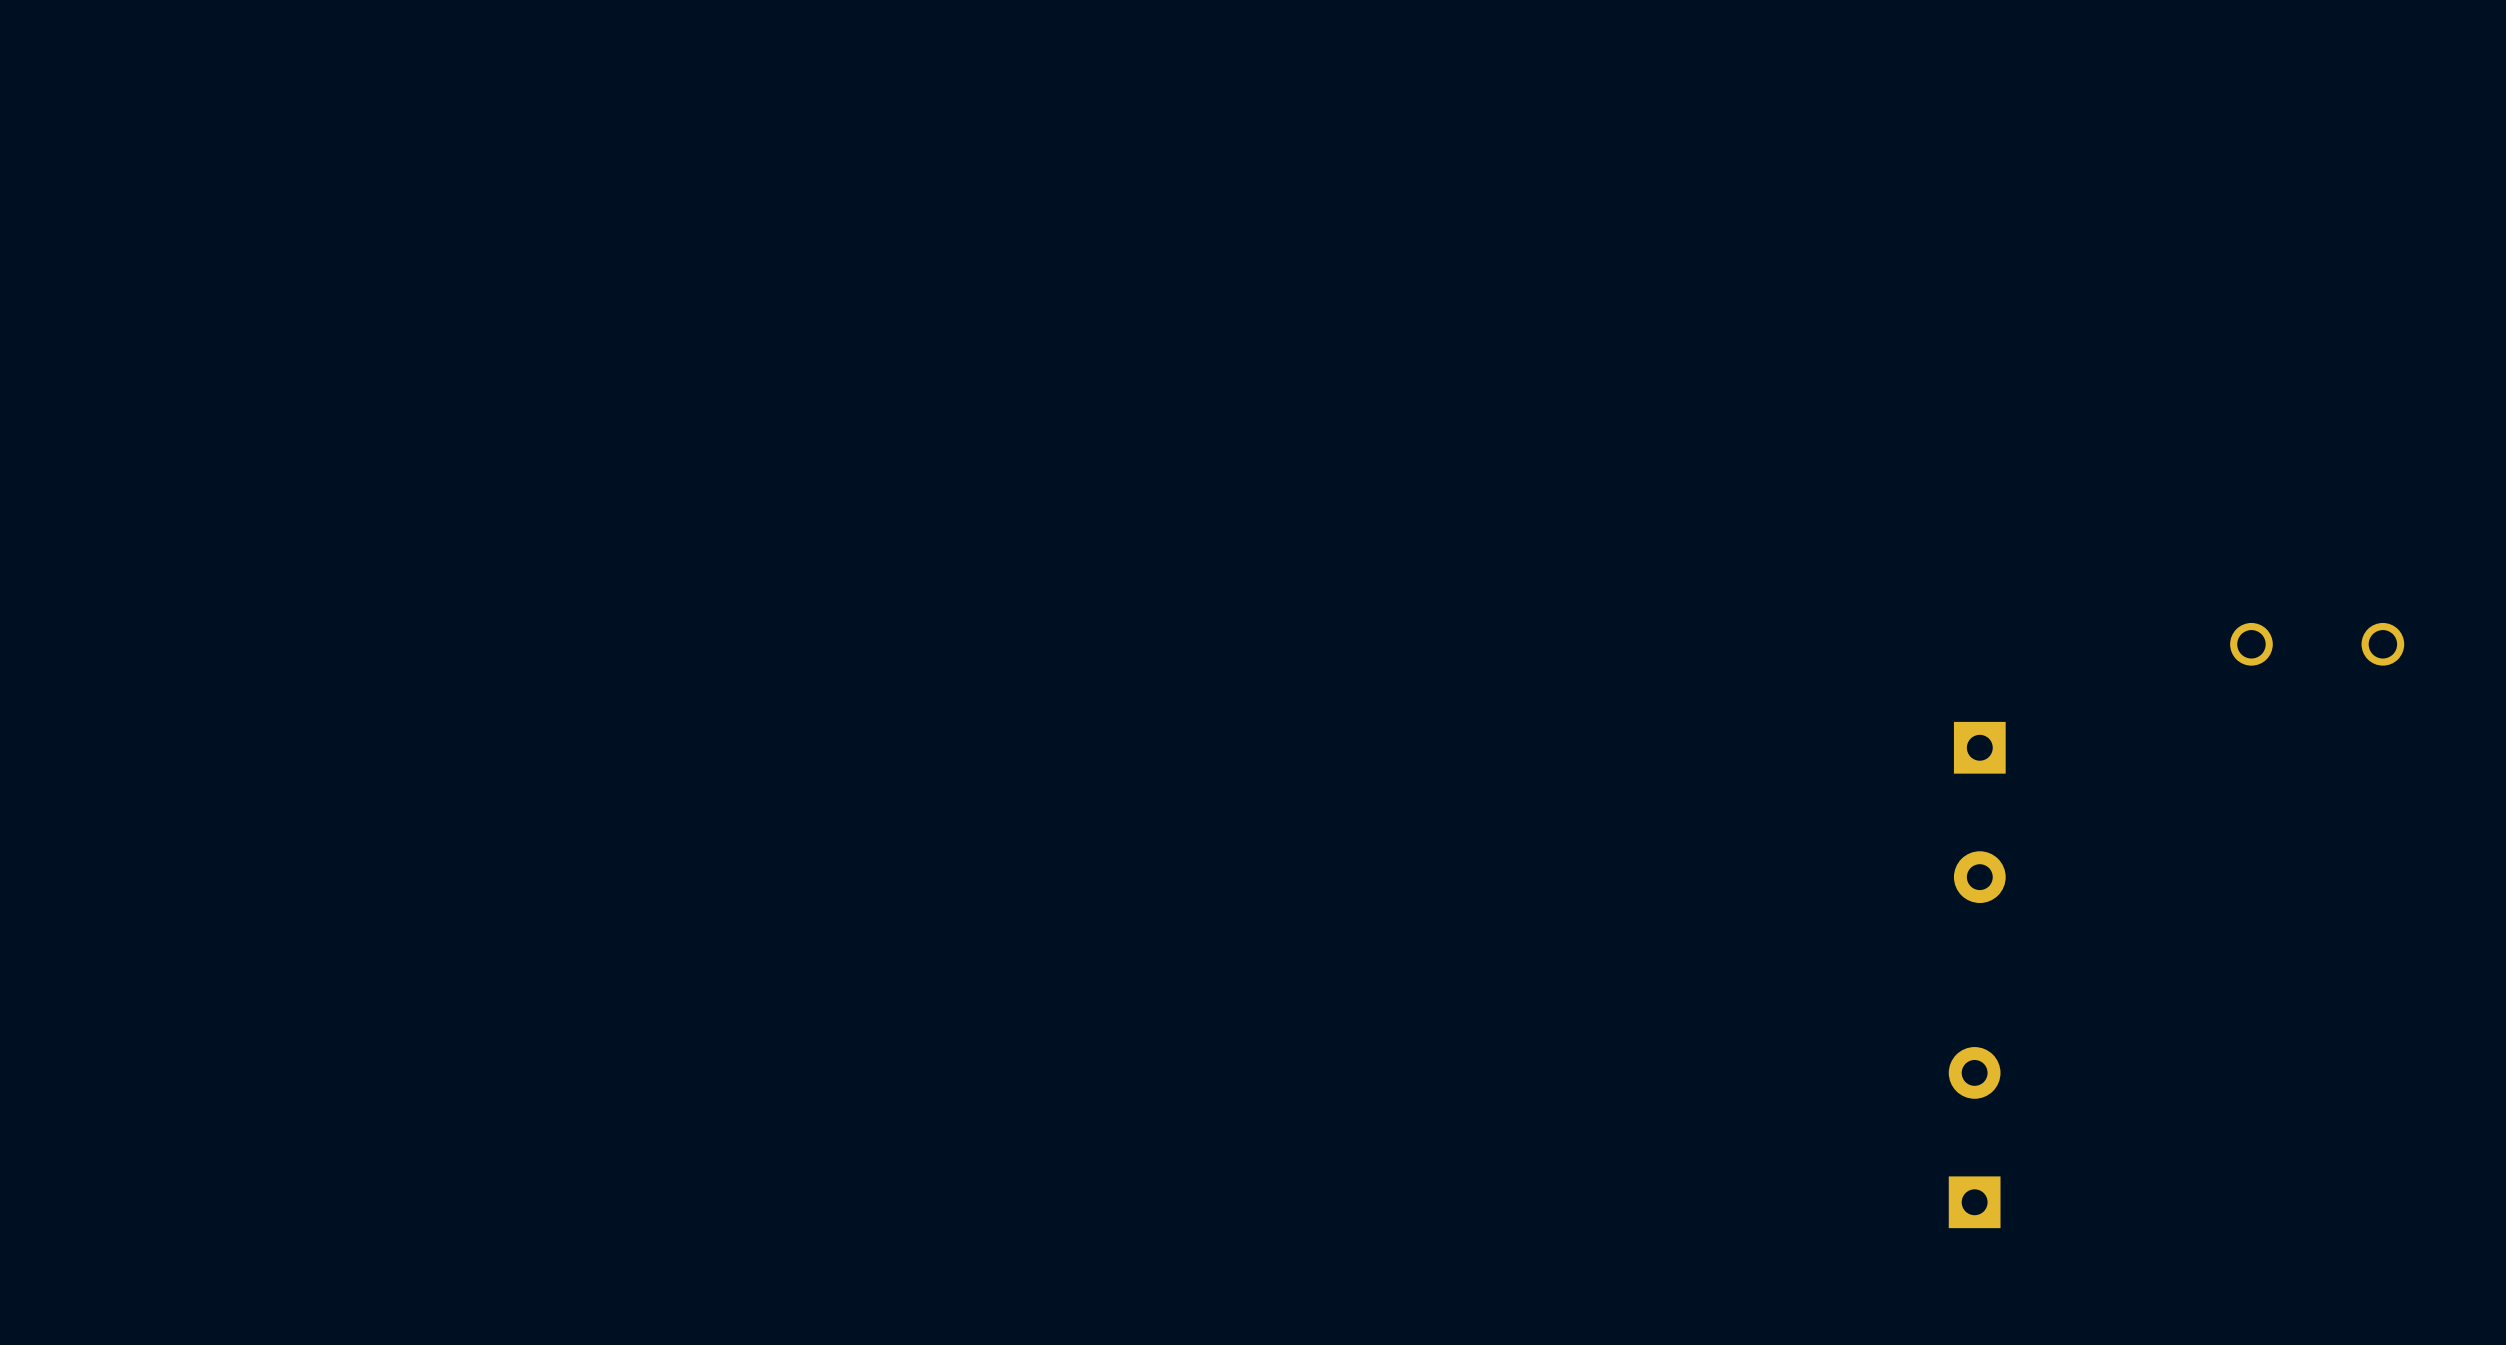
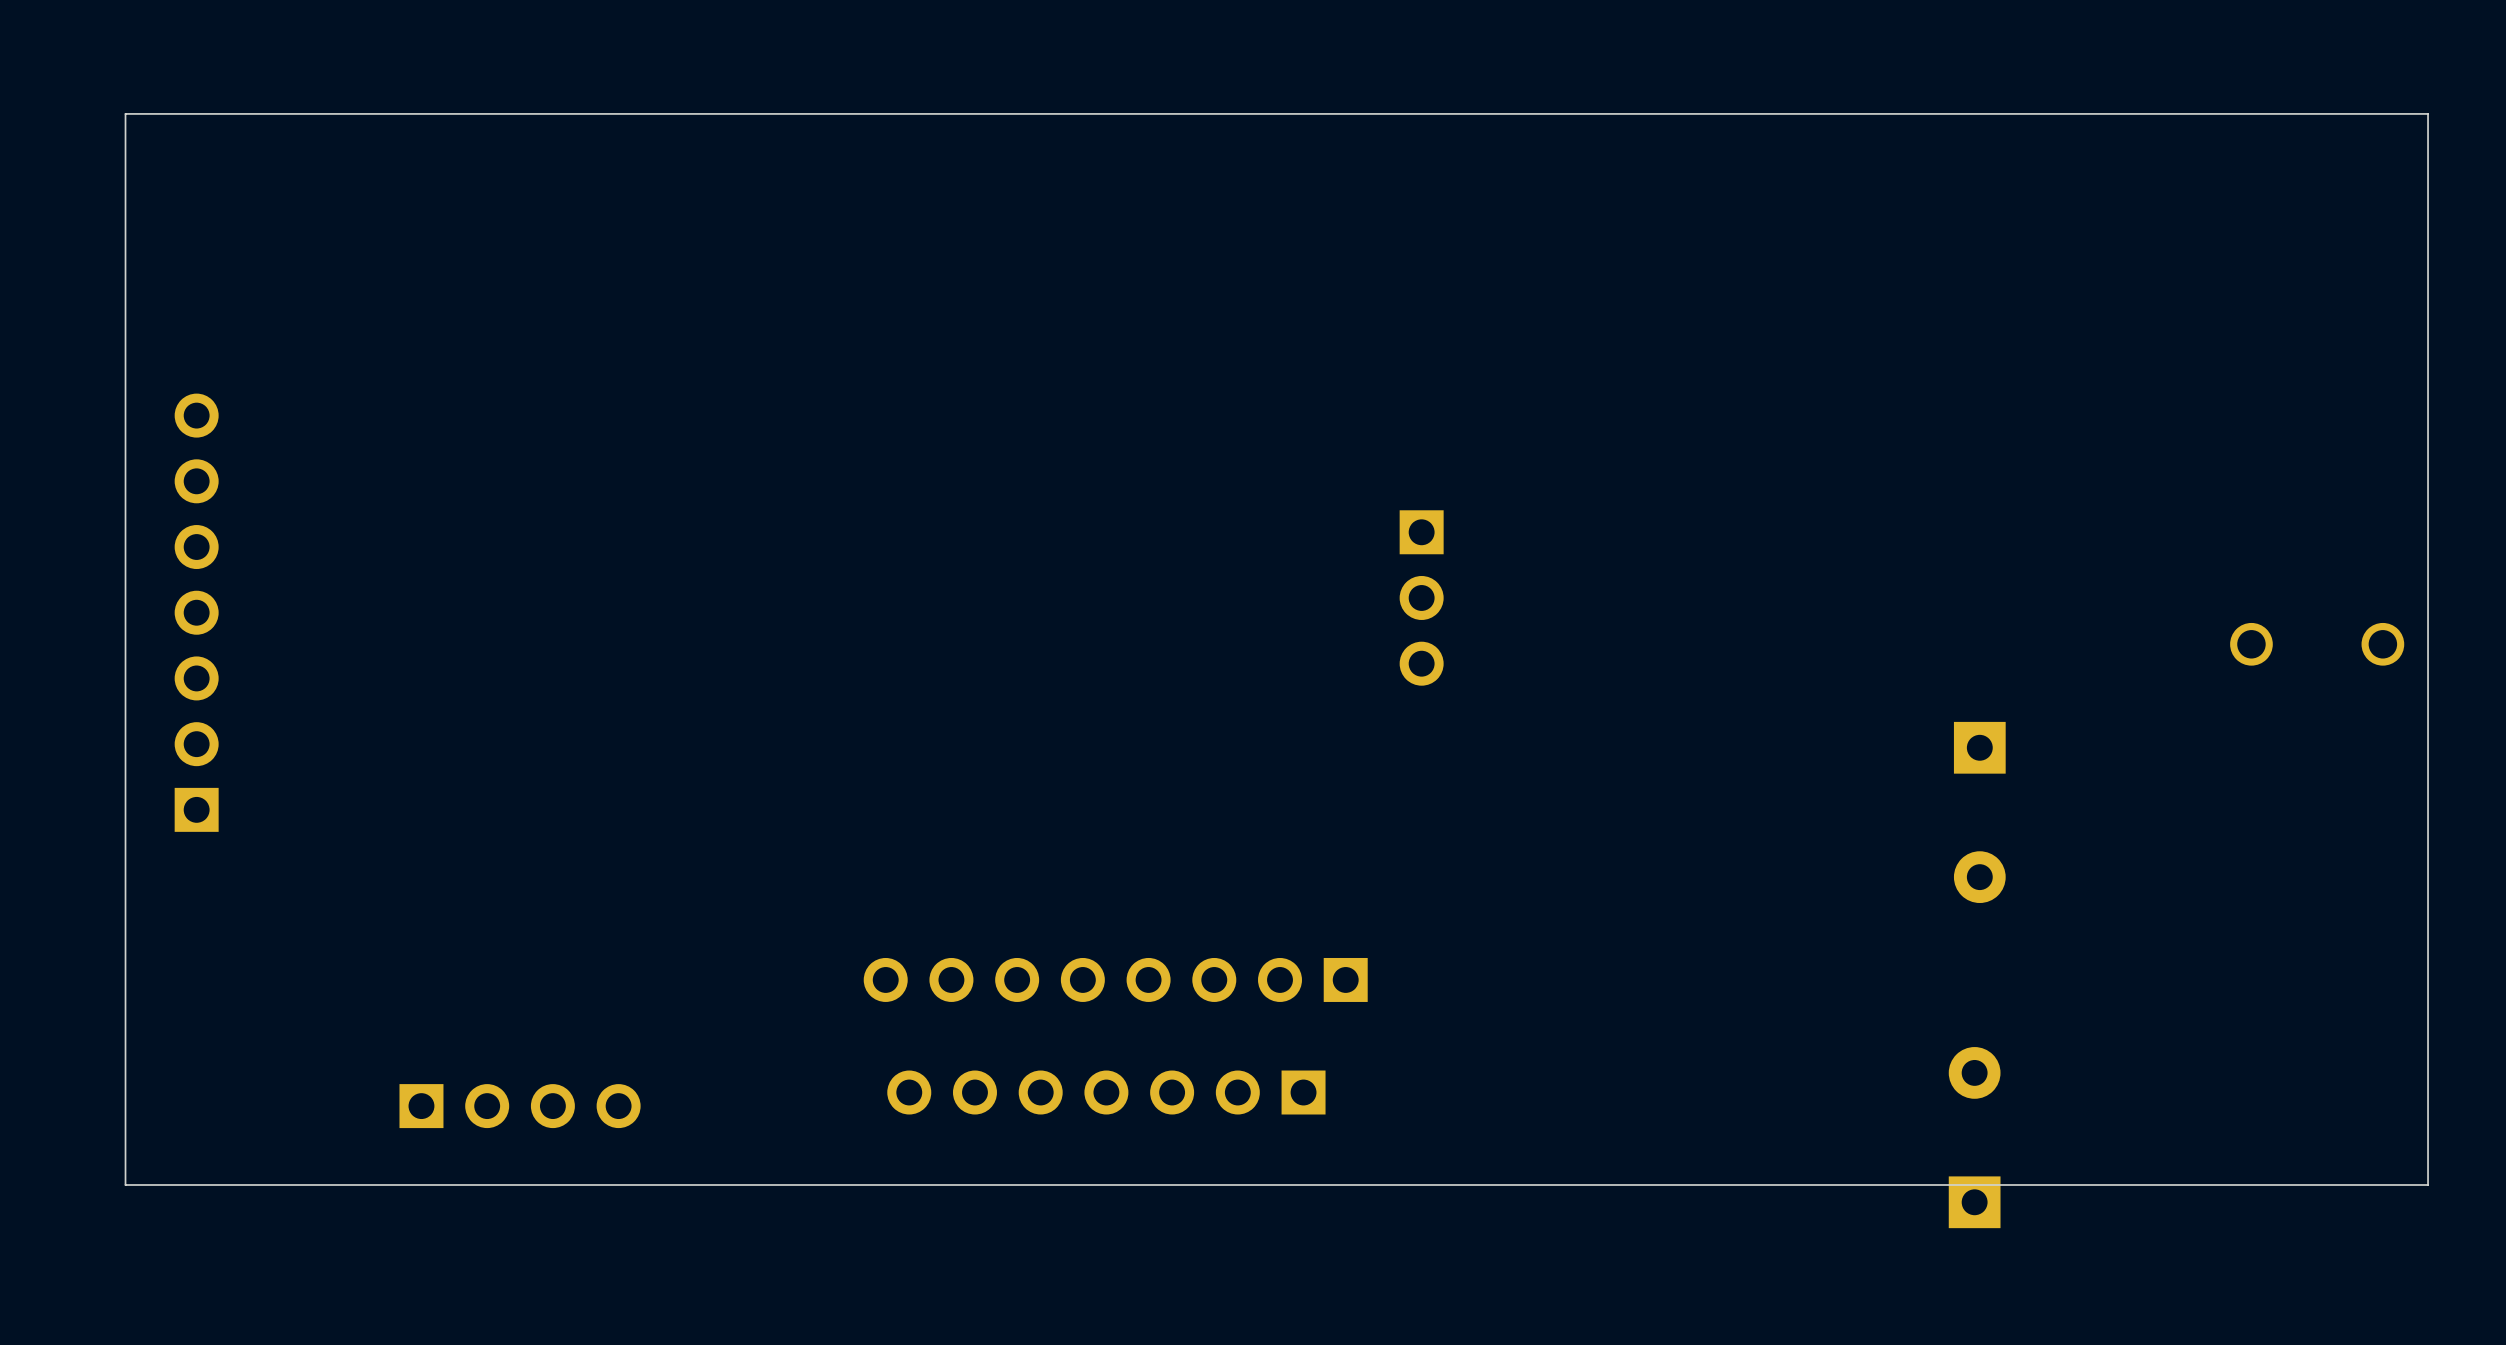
board edge: none -> (2428, 113) (125, 113) (125, 1185) (2428, 1185) (2428, 113)
part: none -> (1421, 597)
part: none -> (196, 612)
part: none -> (1115, 979)
part: none -> (1106, 1092)
part: none -> (520, 1106)

